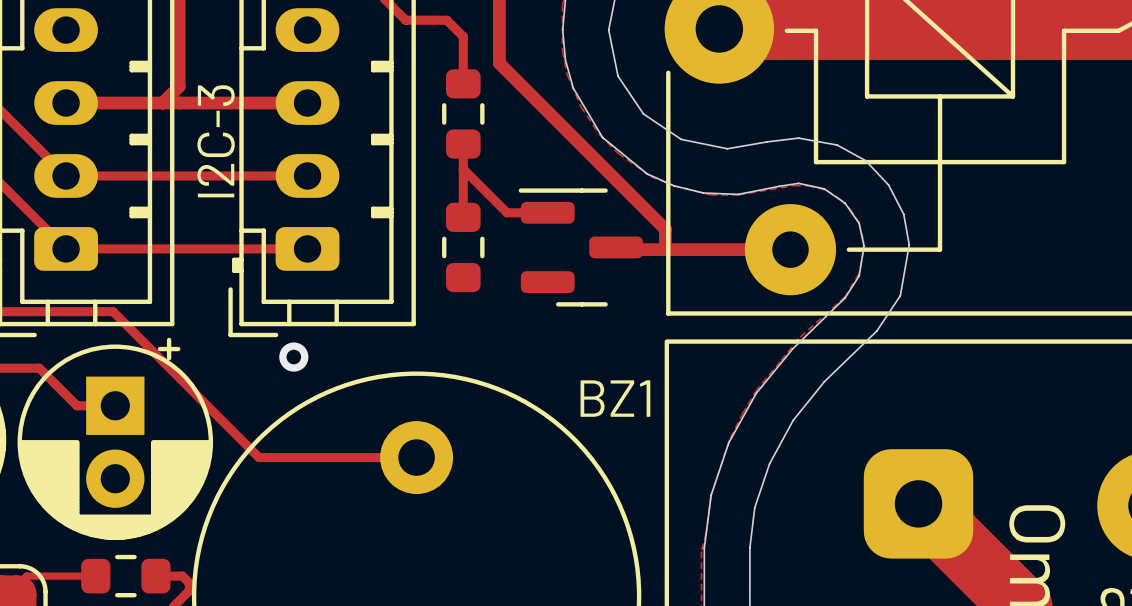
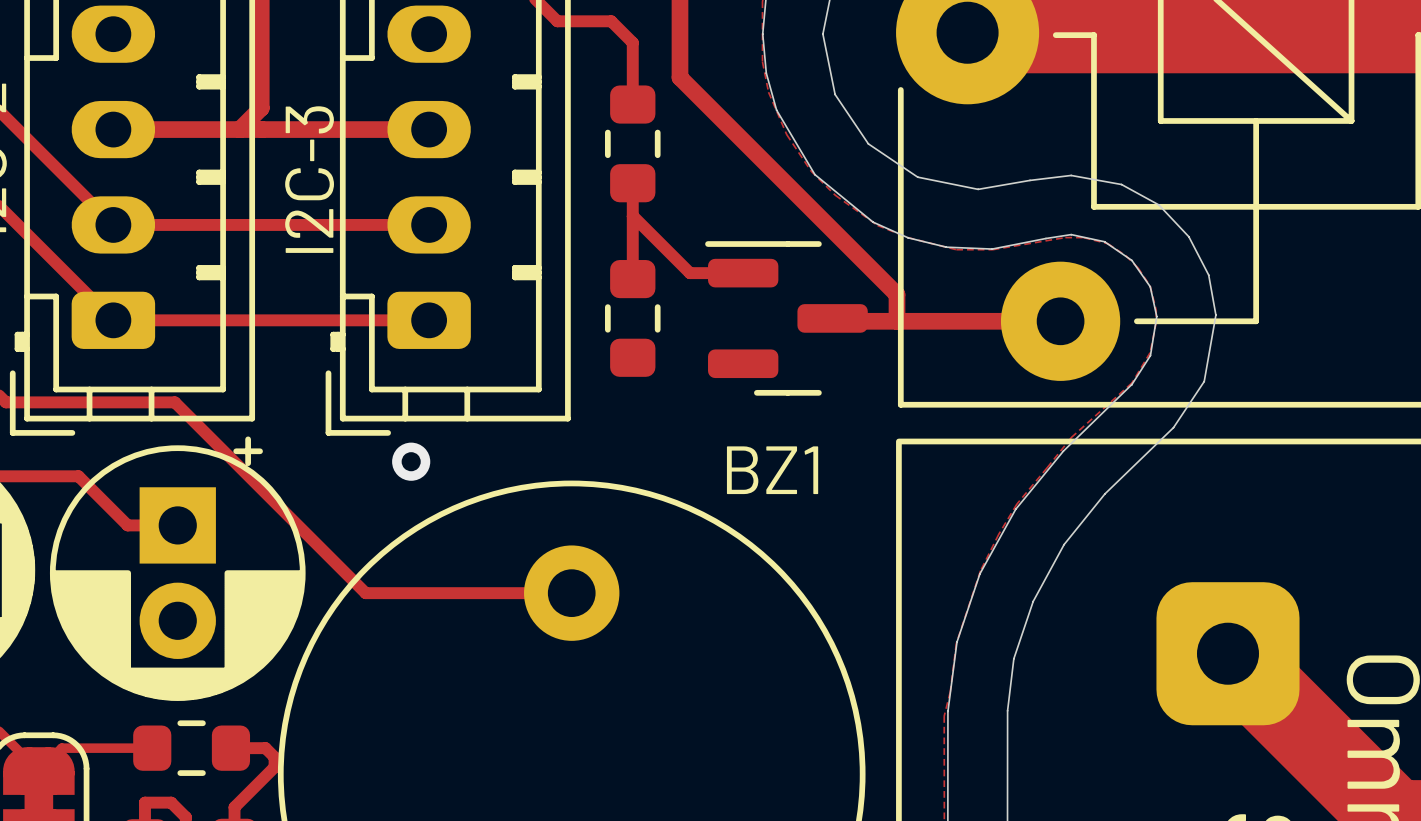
BZ1 name position: BZ1 (615, 398) -> BZ1 (772, 470)

